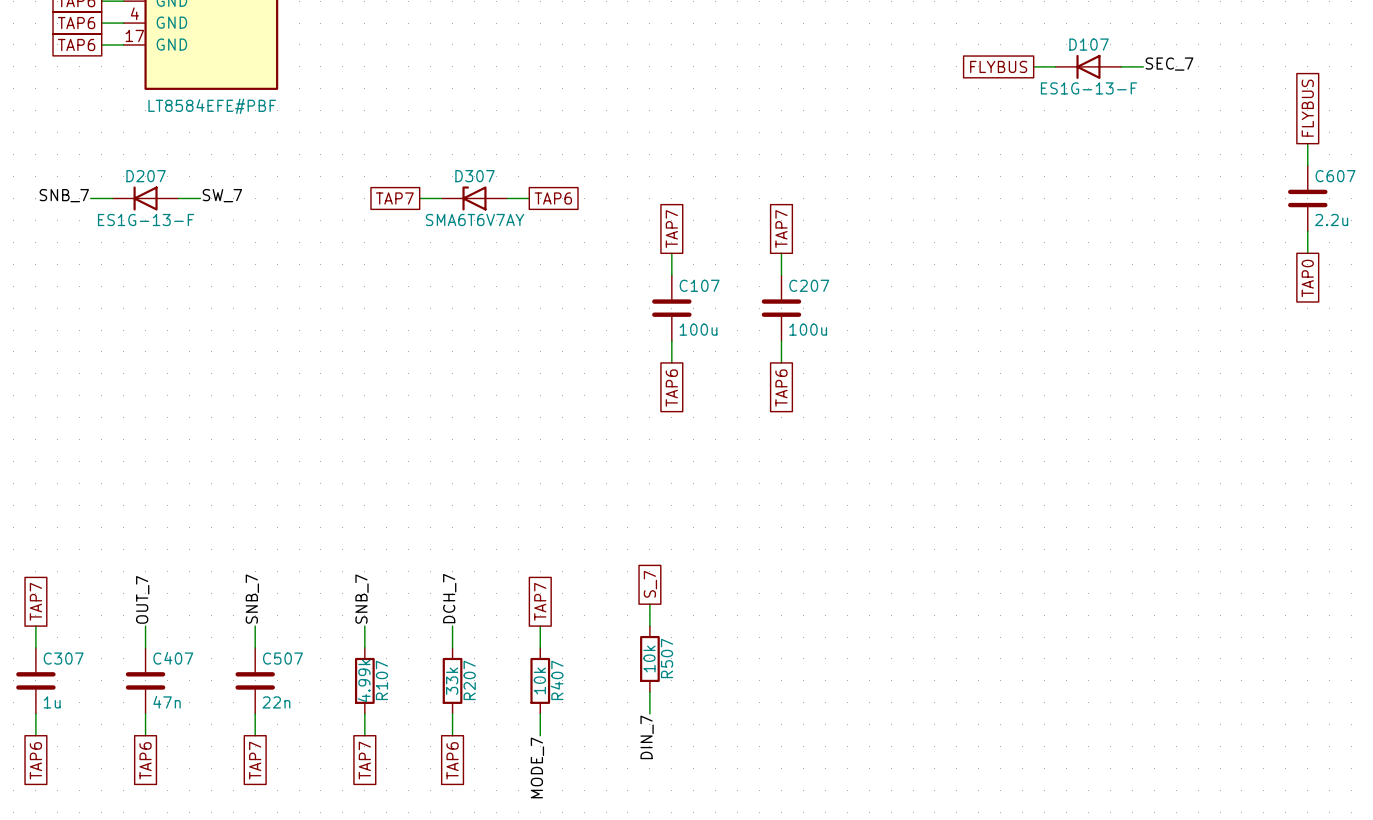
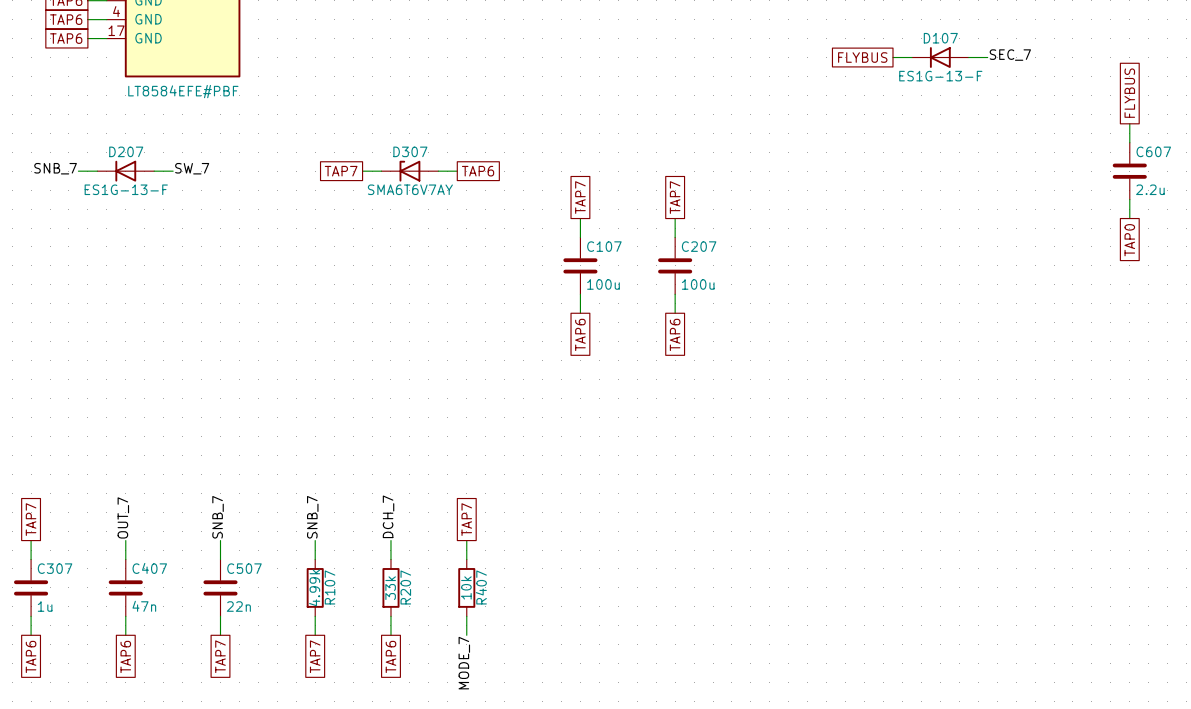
global label: S_7 (650, 584) -> none
wire: (649, 604) (649, 626) -> none
R507: 10k (649, 658) -> none
wire: (649, 691) (649, 713) -> none
label: DIN_7 (647, 737) -> none

